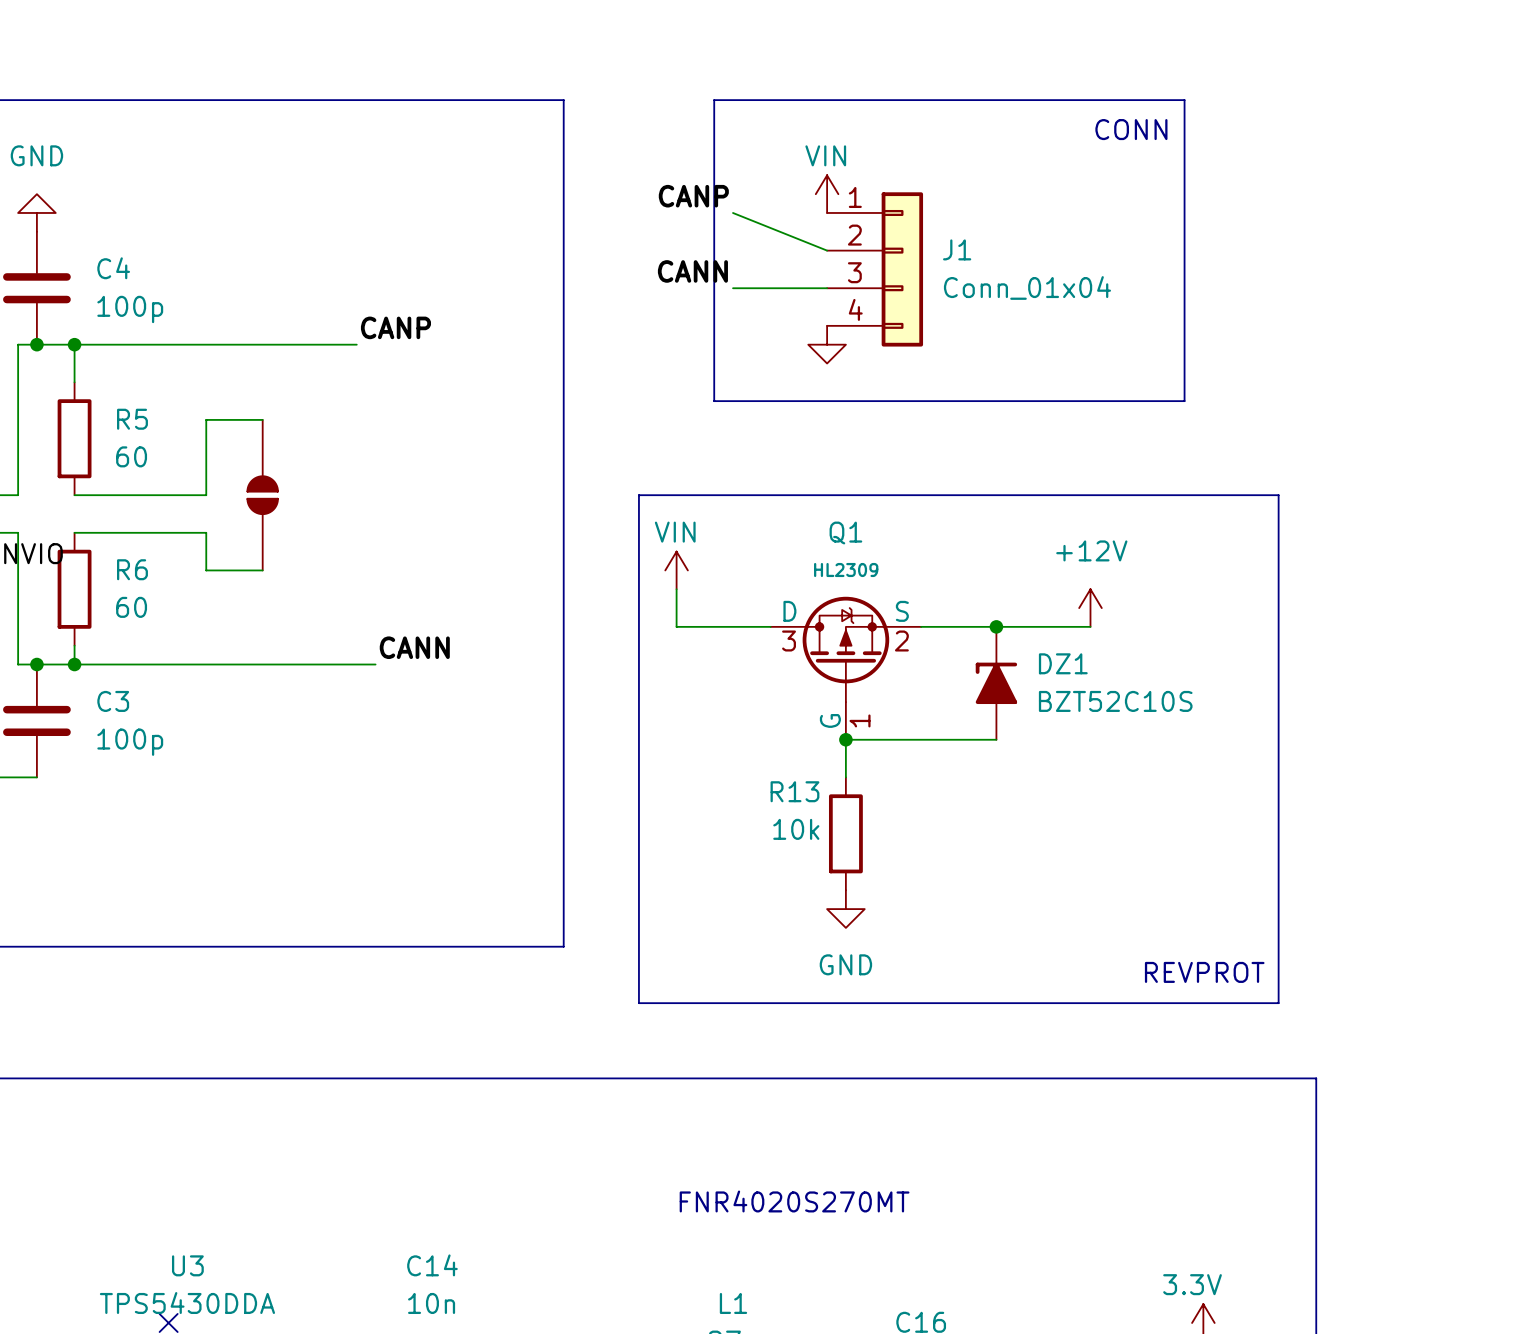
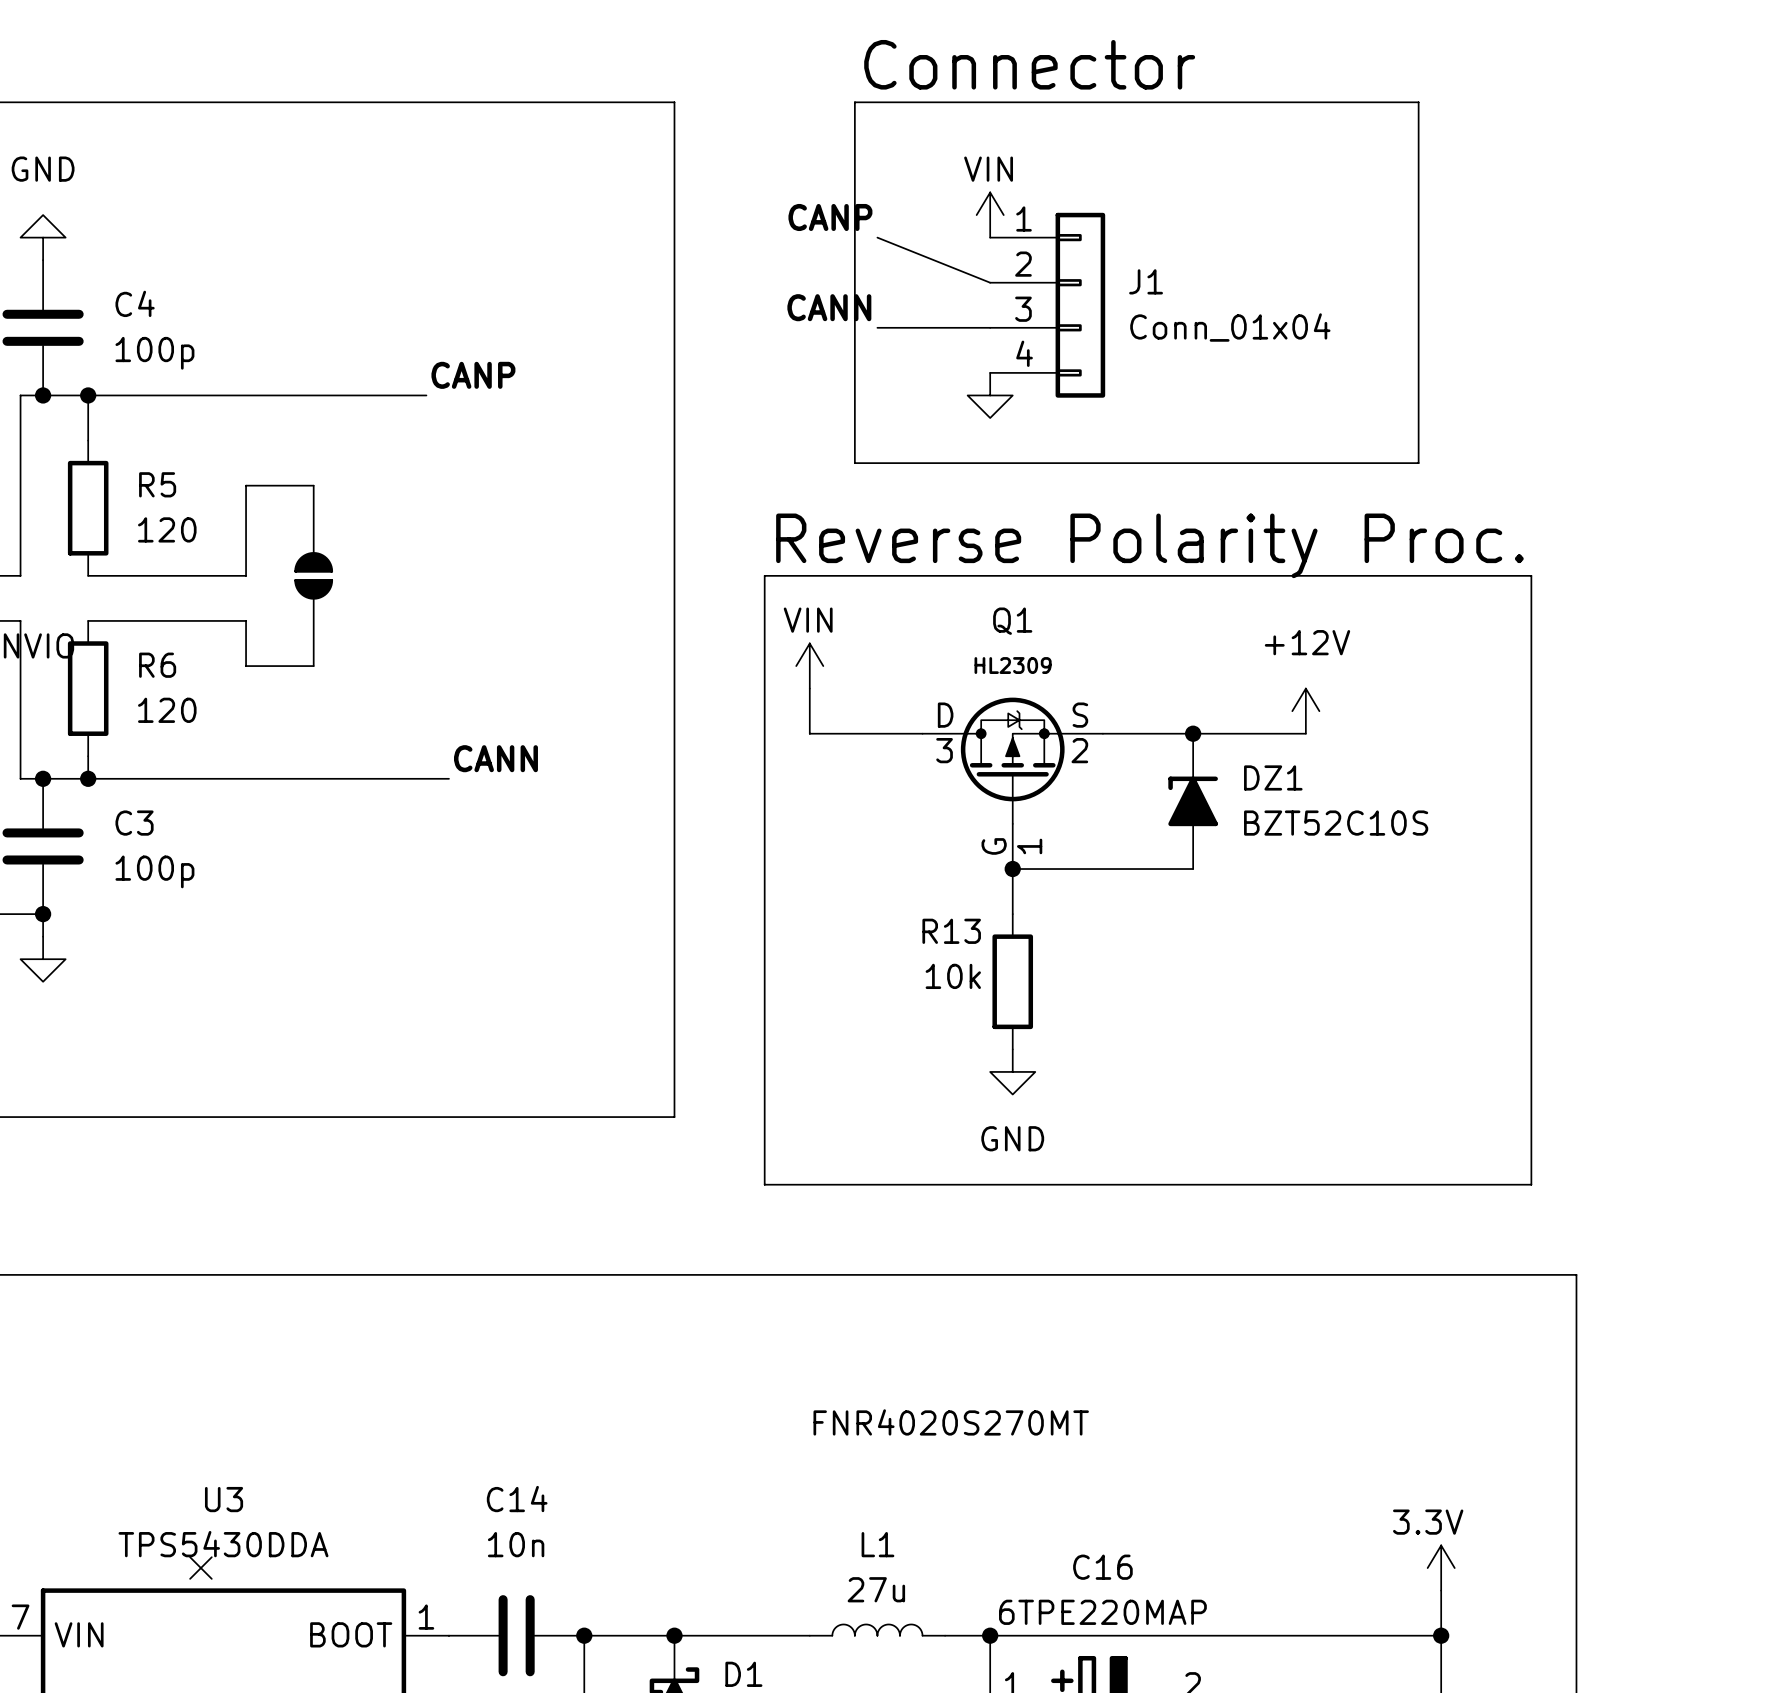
label: none -> Connector (1029, 64)
text: CONN (1131, 129) -> none
R5 value: 60 (131, 456) -> 120 (167, 529)
label: none -> Reverse Polarity Proc. (1149, 545)
R6 value: 60 (131, 607) -> 120 (167, 710)
wire: none -> (43, 914) (43, 936)
junction: none -> (43, 914)
power symbol: none -> (43, 959)
text: REVPROT (1204, 972) -> none

